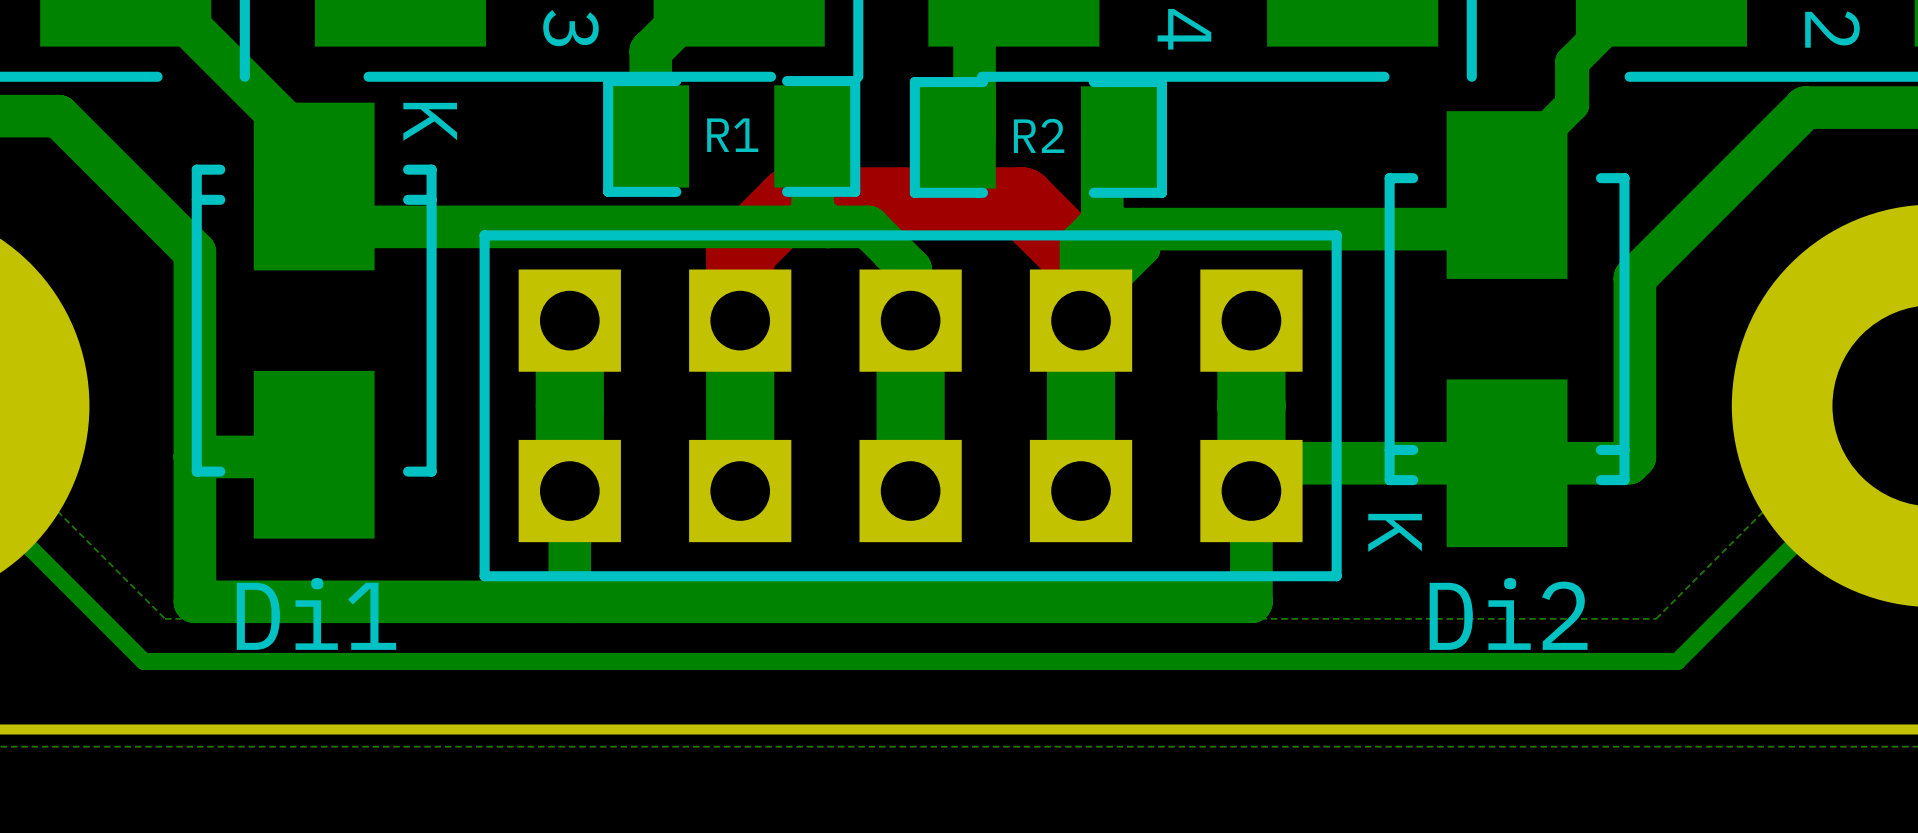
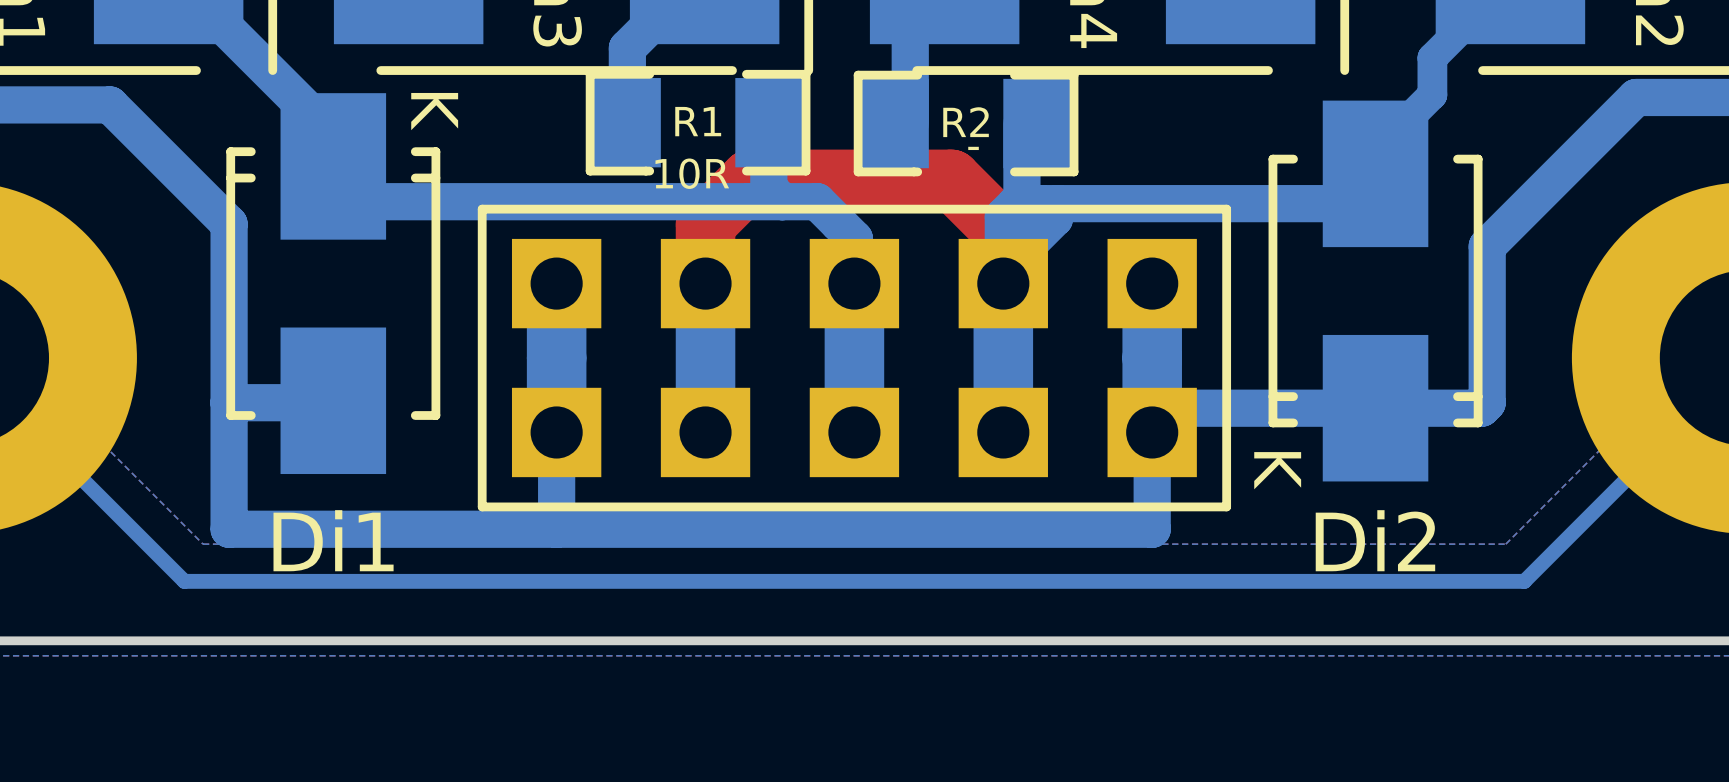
R2 value: none -> - (973, 148)
R1 value: none -> 10R (692, 173)

